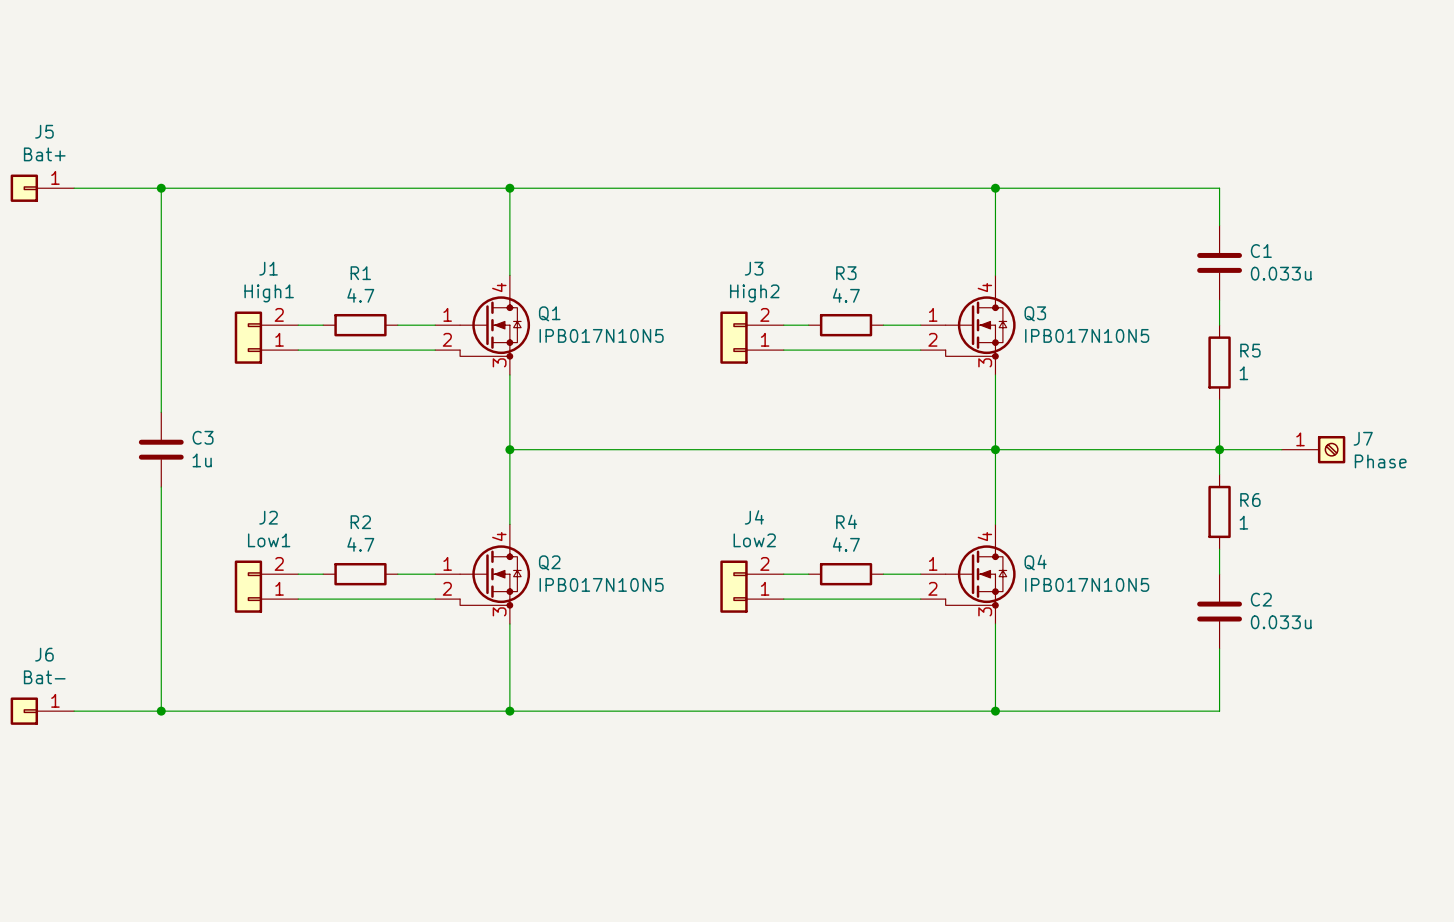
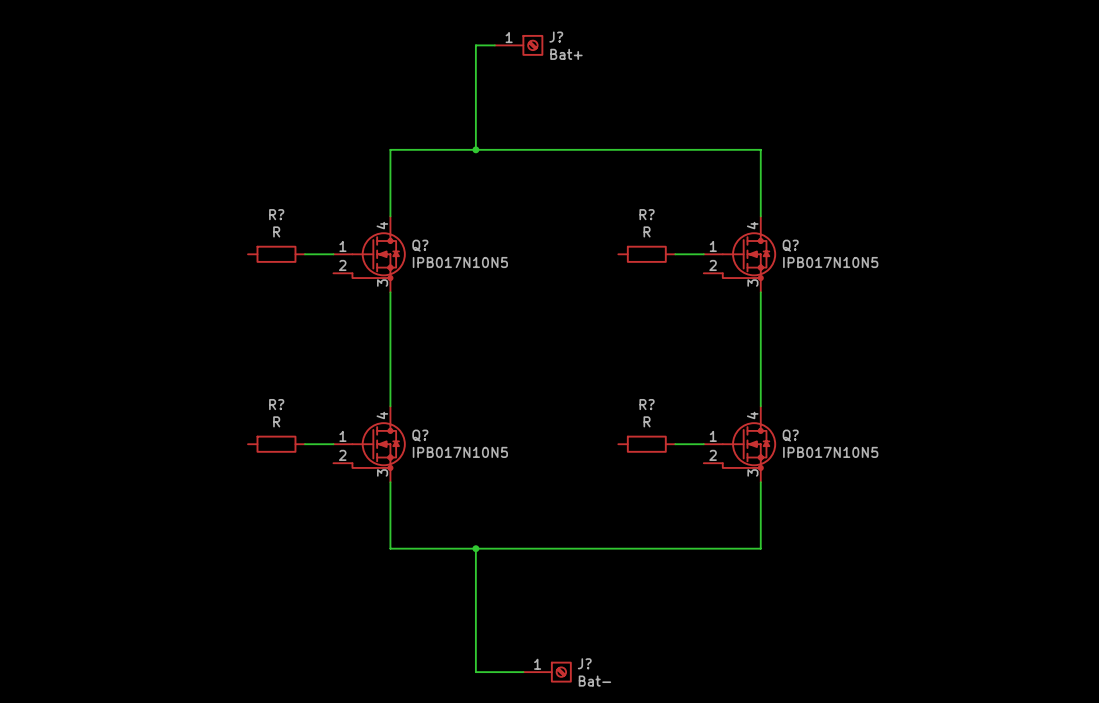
wire: none -> (494, 45) (475, 45) (475, 149)
J?: none -> Bat+ (519, 45)
J5: Bat+ (42, 188) -> none
wire: (74, 188) (509, 188) -> none
wire: (161, 188) (161, 412) -> none
junction: (161, 188) -> none
junction: (509, 188) -> none
junction: none -> (475, 149)
wire: (995, 188) (1219, 188) (1219, 225) -> none
junction: (995, 188) -> none
C1: 0.033u (1219, 262) -> none
R1 name: R1 (360, 273) -> R? (276, 214)
R3 name: R3 (846, 273) -> R? (647, 214)
R1 value: 4.7 (360, 295) -> R (276, 231)
R3 value: 4.7 (846, 295) -> R (647, 231)
wire: (1219, 300) (1219, 325) -> none
Q1 name: Q1 (549, 313) -> Q? (420, 245)
Q3 name: Q3 (1035, 313) -> Q? (790, 245)
wire: (298, 325) (323, 325) -> none
wire: (783, 325) (808, 325) -> none
J1: High1 (266, 337) -> none
J3: High2 (752, 337) -> none
wire: (298, 350) (435, 350) -> none
wire: (783, 350) (920, 350) -> none
R5: 1 (1219, 362) -> none
wire: (1219, 399) (1219, 474) -> none
C3: 1u (161, 449) -> none
wire: (509, 449) (1281, 449) -> none
junction: (509, 449) -> none
junction: (995, 449) -> none
junction: (1219, 449) -> none
J7: Phase (1313, 449) -> none
wire: (161, 487) (161, 711) -> none
R6: 1 (1219, 511) -> none
R4 name: R4 (846, 521) -> R? (647, 404)
R2 name: R2 (360, 522) -> R? (276, 404)
R2 value: 4.7 (360, 544) -> R (276, 421)
R4 value: 4.7 (846, 544) -> R (647, 421)
wire: (1219, 549) (1219, 574) -> none
Q2 name: Q2 (549, 562) -> Q? (420, 435)
Q4 name: Q4 (1035, 562) -> Q? (790, 435)
wire: (298, 574) (323, 574) -> none
wire: (783, 574) (808, 574) -> none
J2: Low1 (266, 586) -> none
J4: Low2 (752, 586) -> none
wire: (298, 599) (435, 599) -> none
wire: (783, 599) (920, 599) -> none
C2: 0.033u (1219, 611) -> none
wire: (1219, 648) (1219, 711) (995, 711) -> none
J6: Bat- (42, 711) -> none
wire: (74, 711) (509, 711) -> none
junction: (161, 711) -> none
junction: (509, 711) -> none
wire: none -> (475, 548) (475, 672) (523, 672)
junction: none -> (475, 548)
junction: (995, 711) -> none
J?: none -> Bat- (547, 672)

